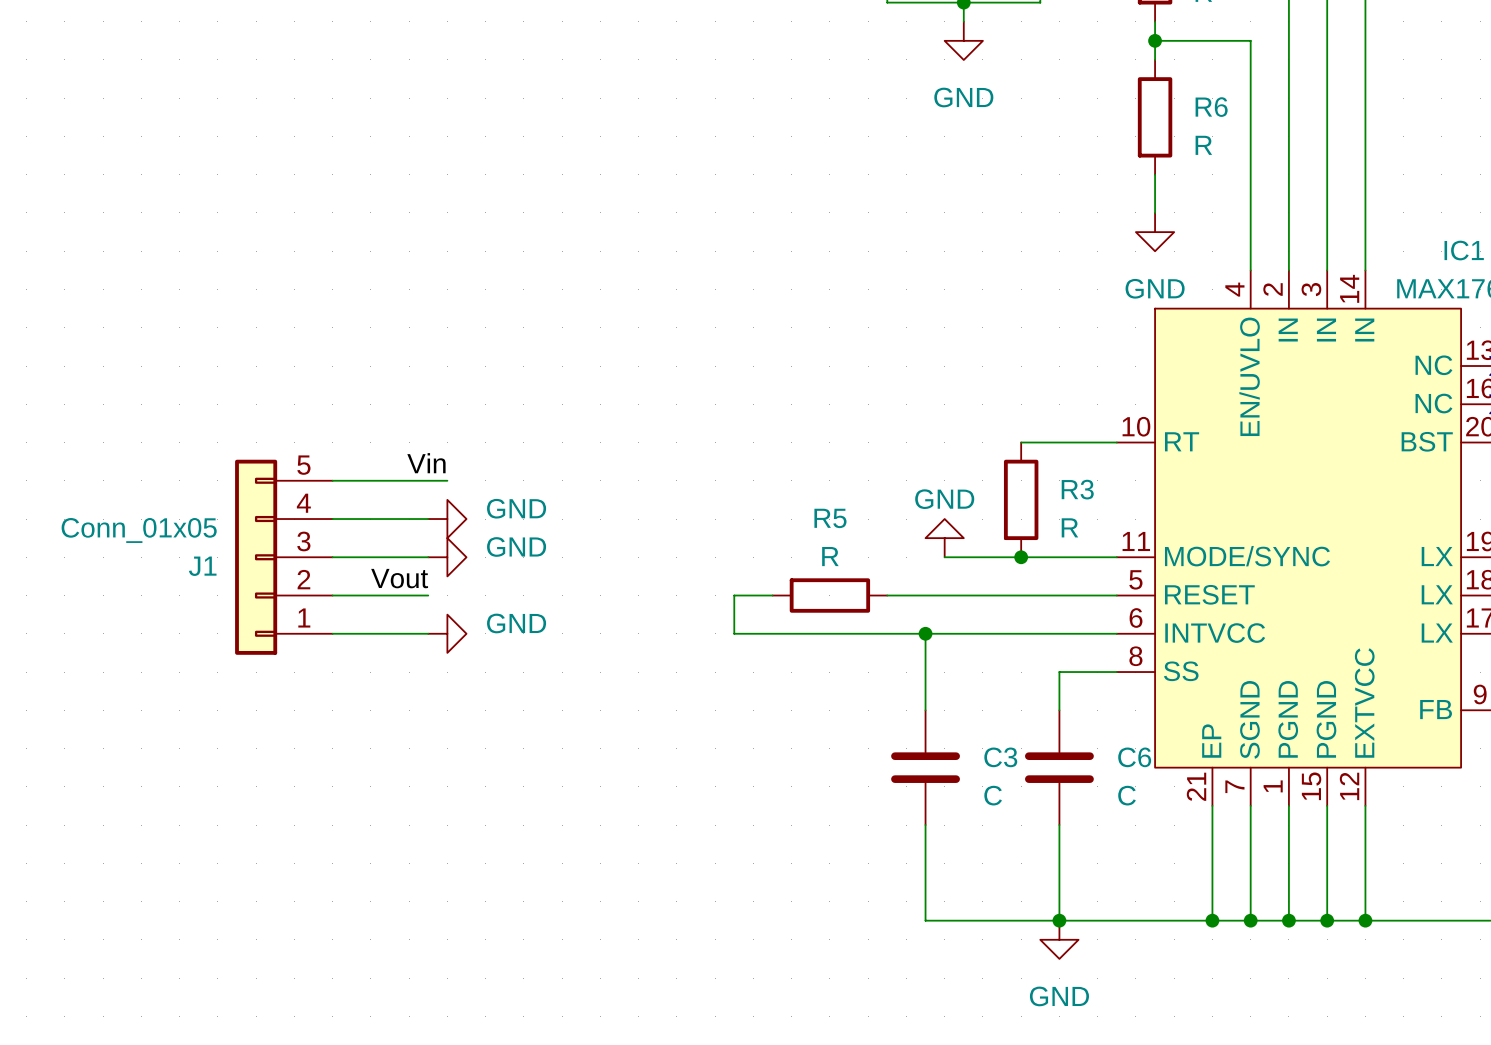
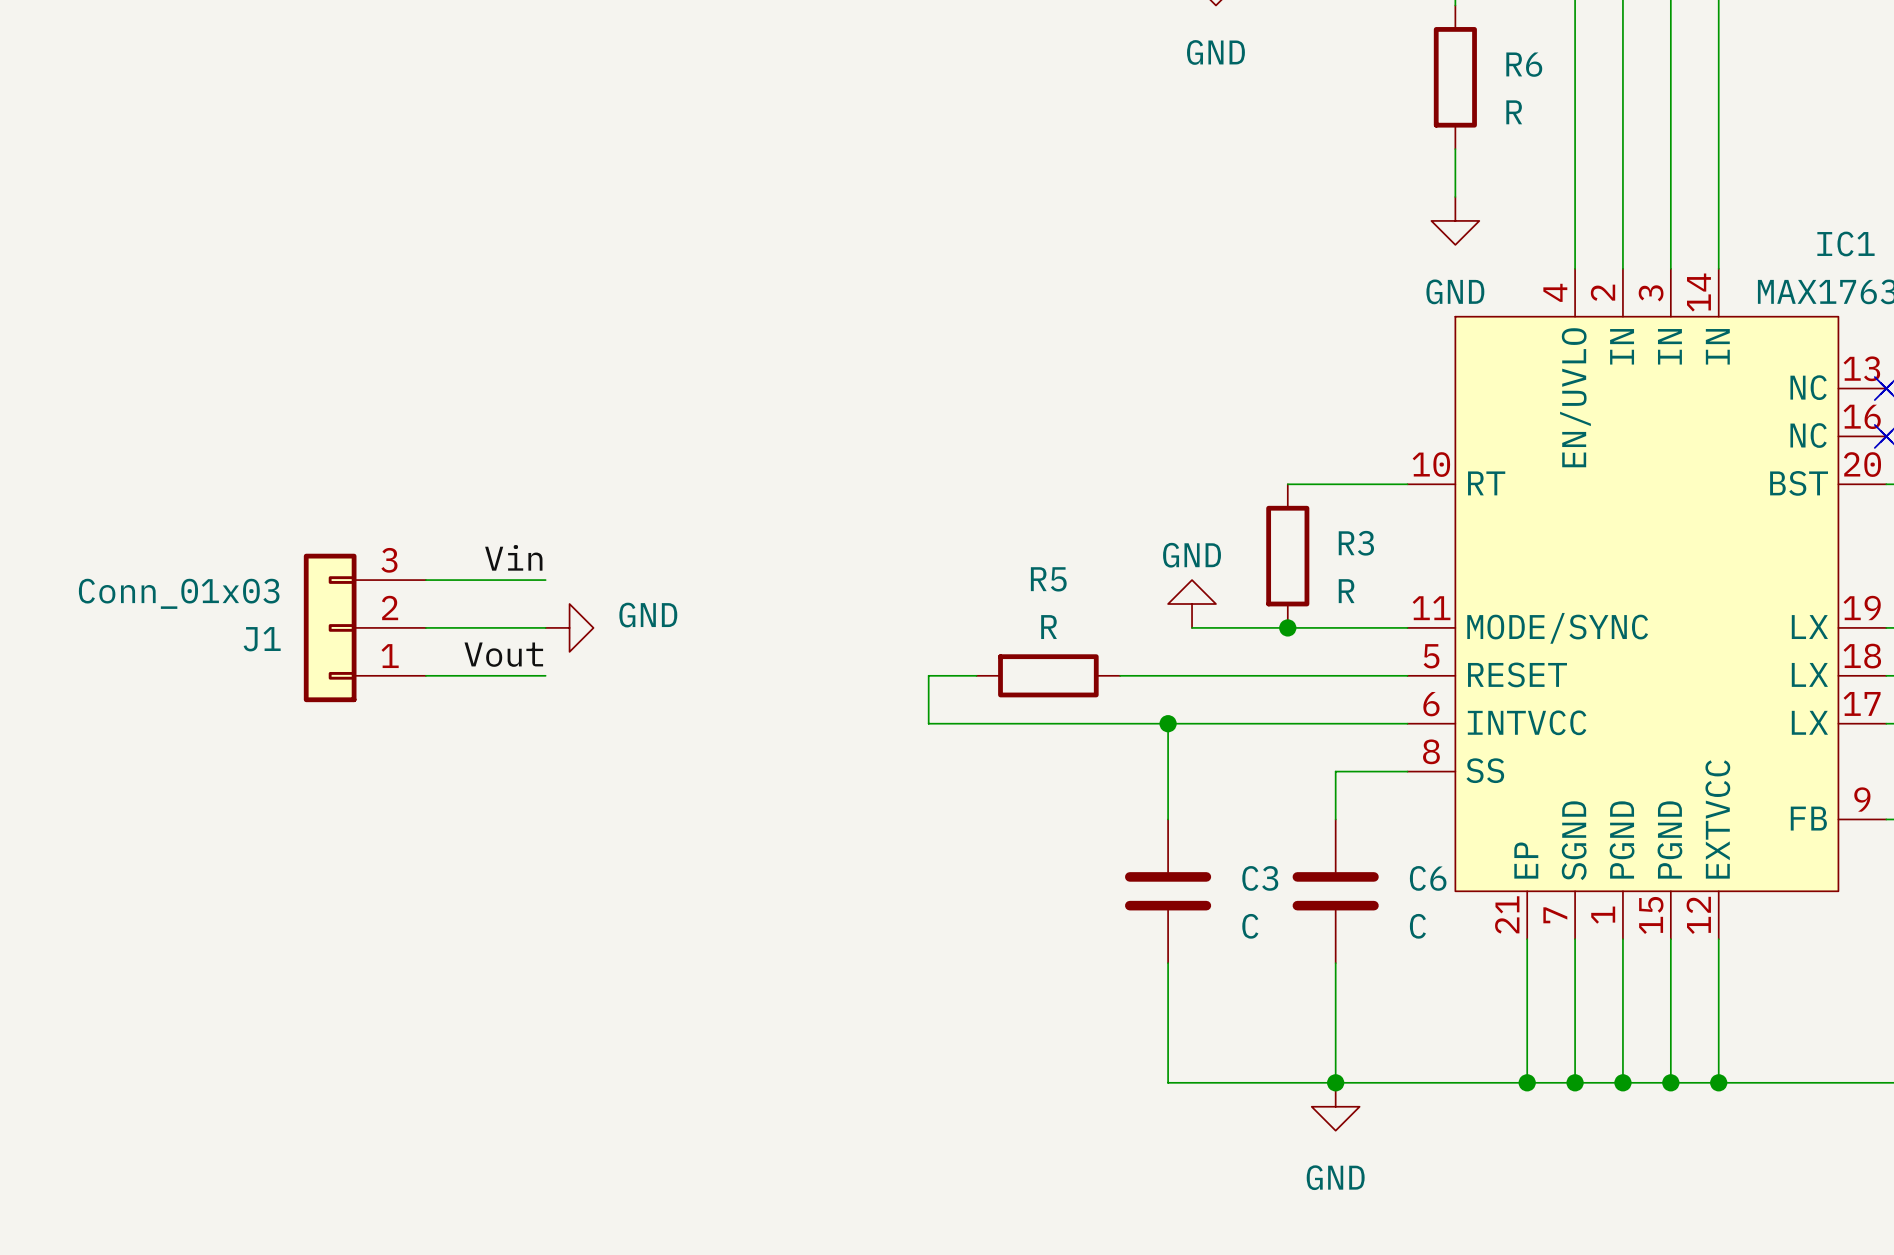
J1 symbol: [235, 459, 333, 655] -> [303, 553, 426, 703]
label position: Vin (426, 463) -> Vin (513, 557)
wire: (332, 480) (447, 480) -> none
power symbol: GND (447, 519) -> none
J1 value: Conn_01x05 (139, 530) -> Conn_01x03 (179, 593)
wire: (332, 633) (428, 633) -> none
power symbol: GND (447, 633) -> none

